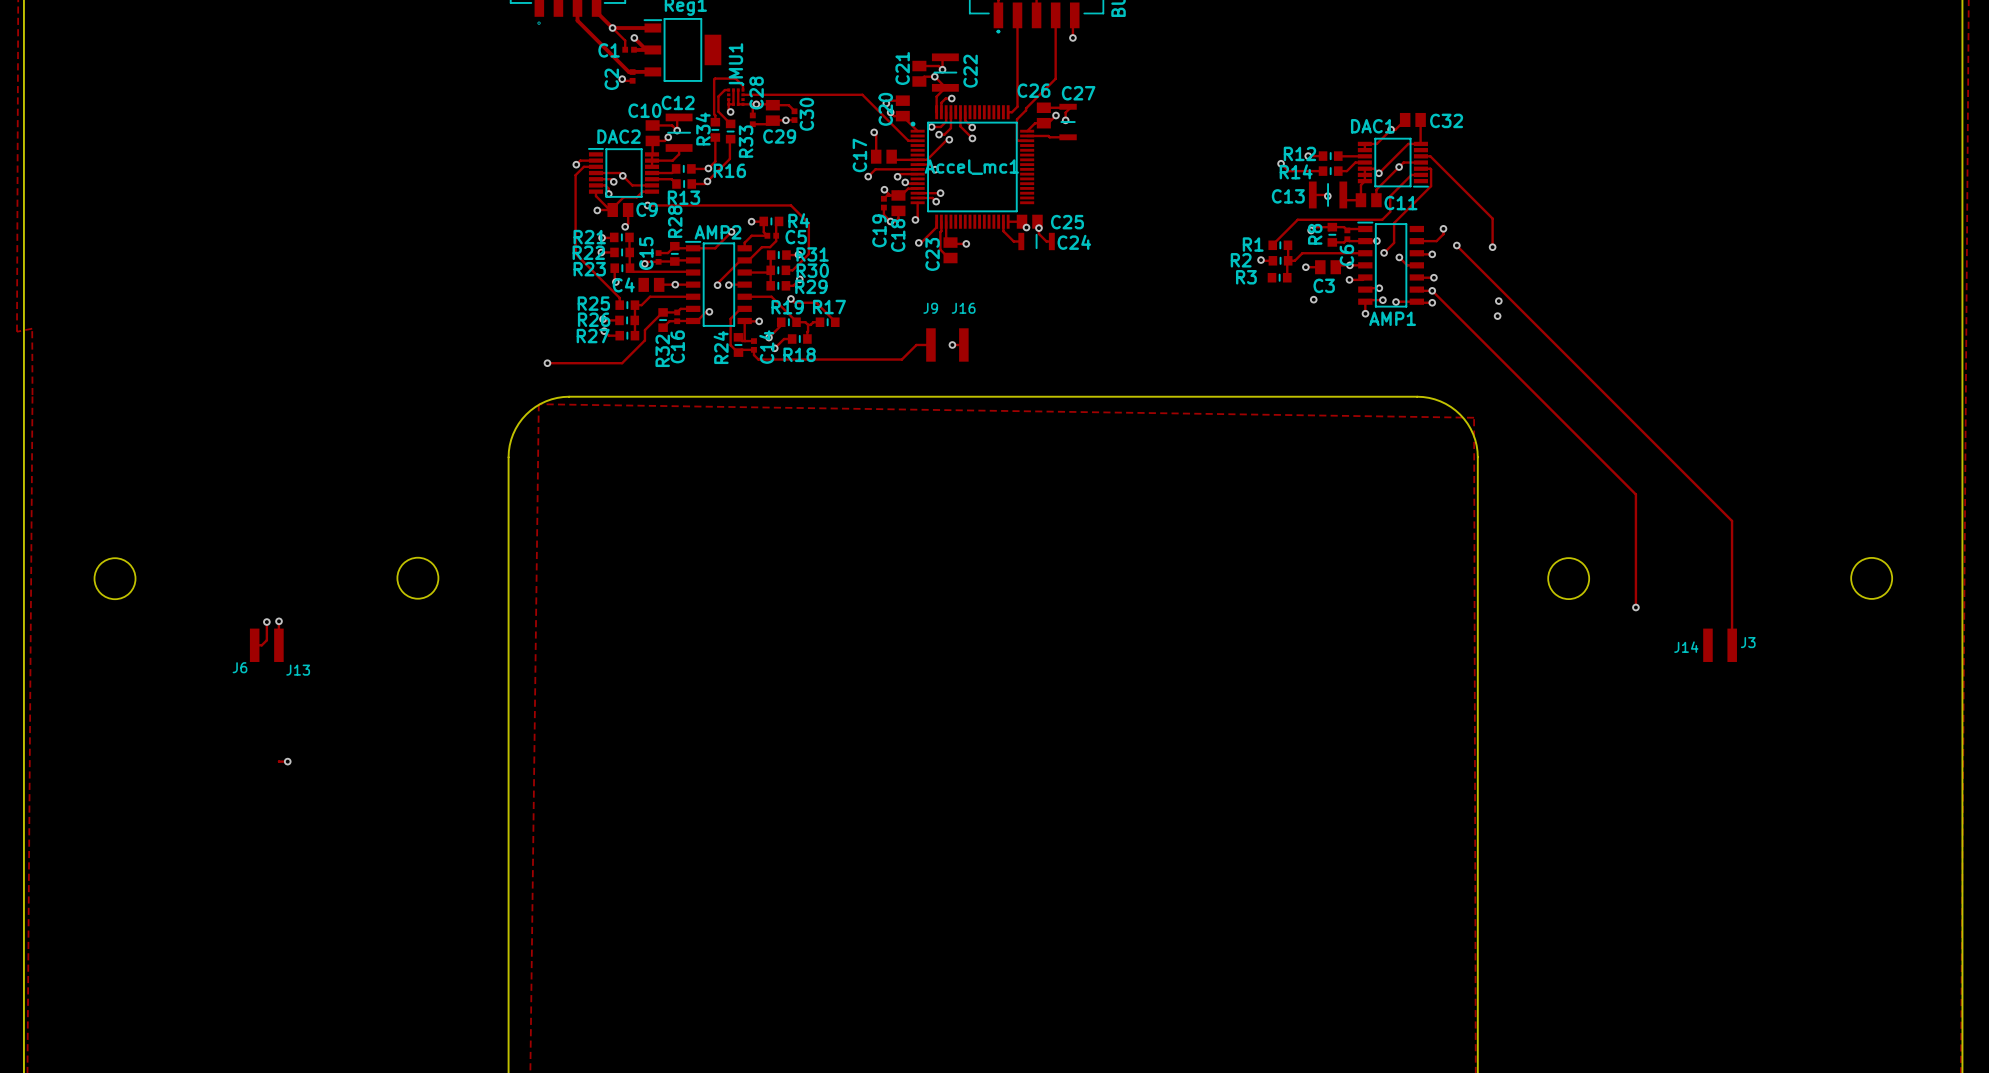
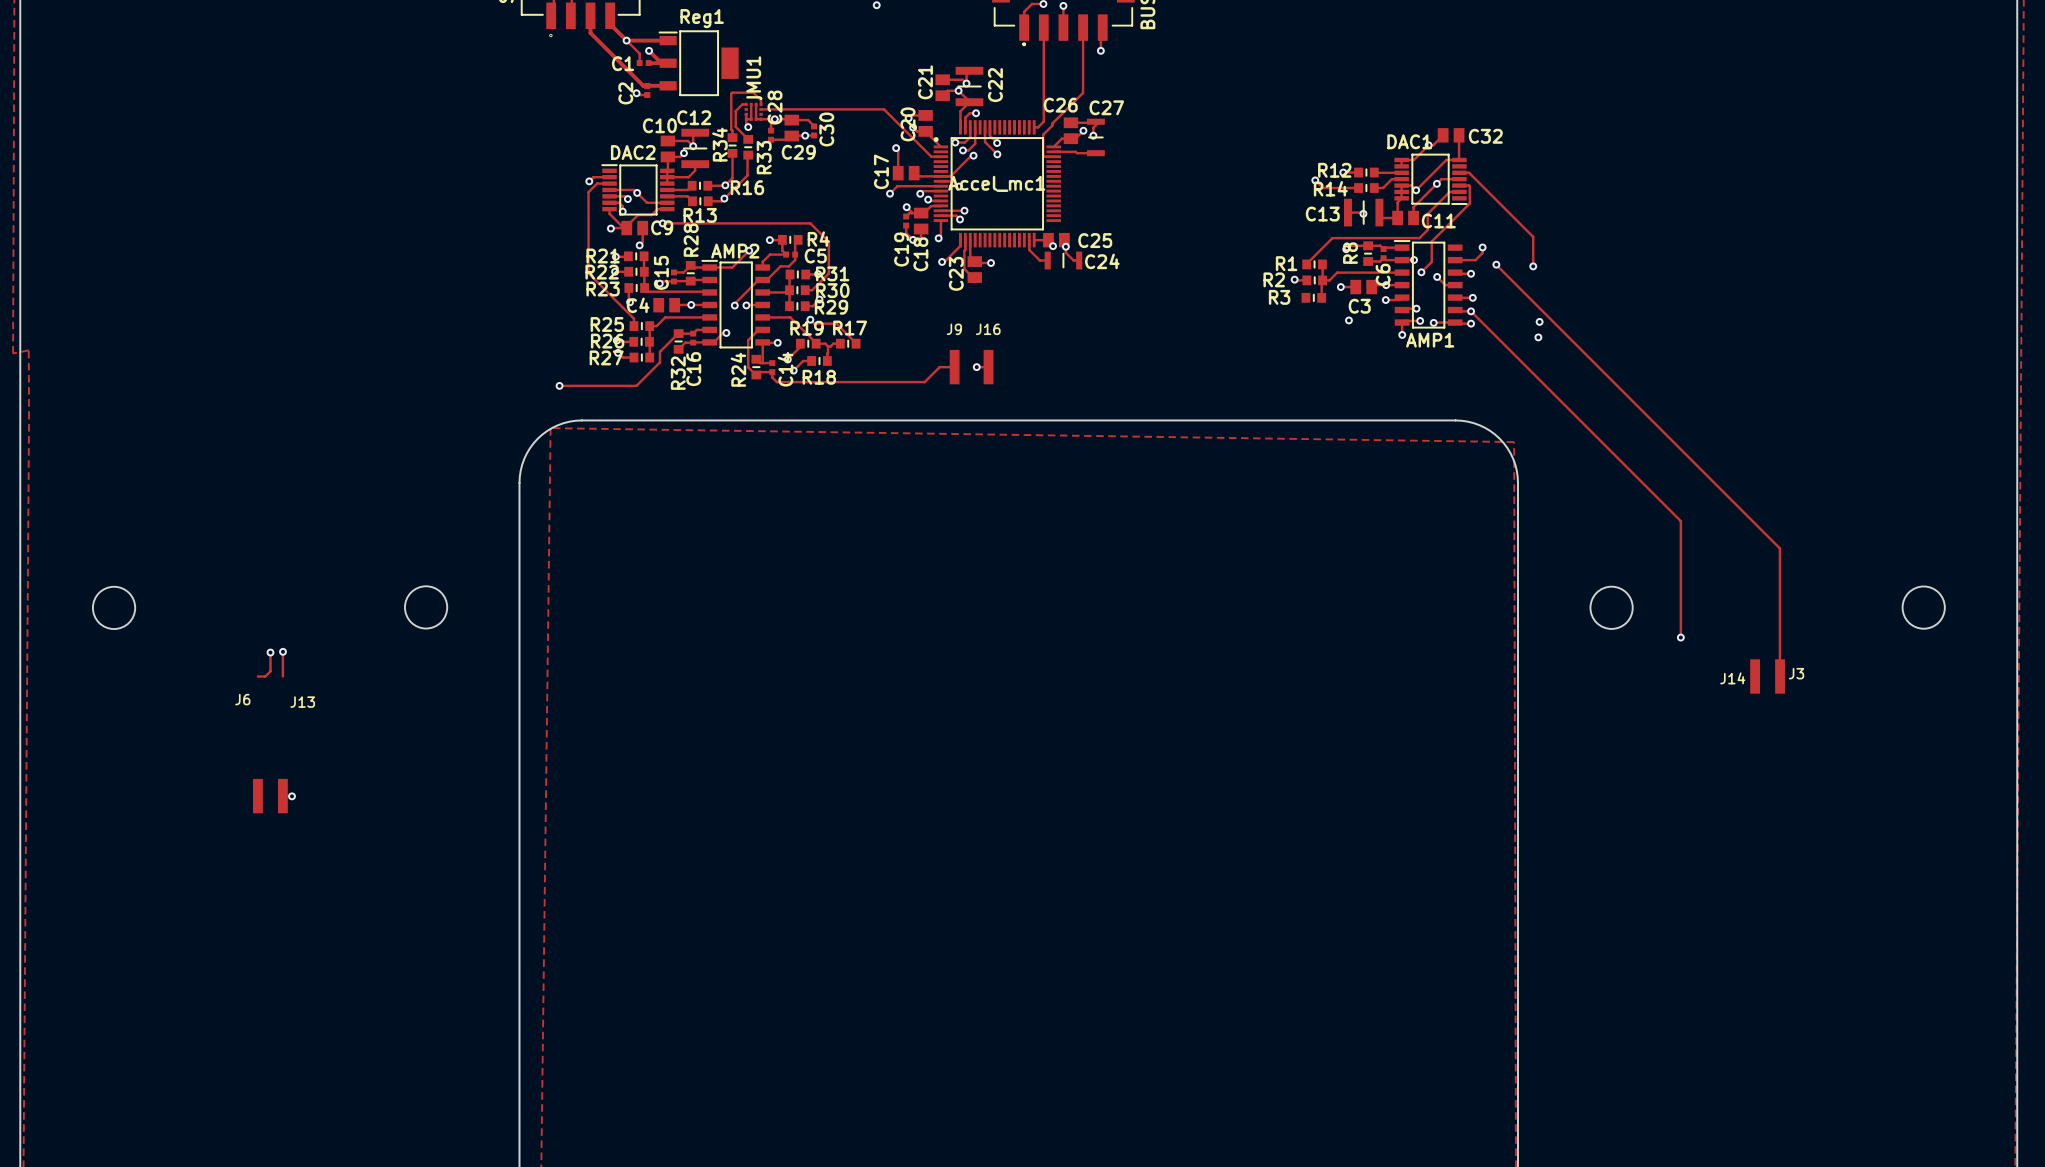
J6 position: (254, 645) -> (257, 796)
J13 position: (278, 645) -> (282, 796)

